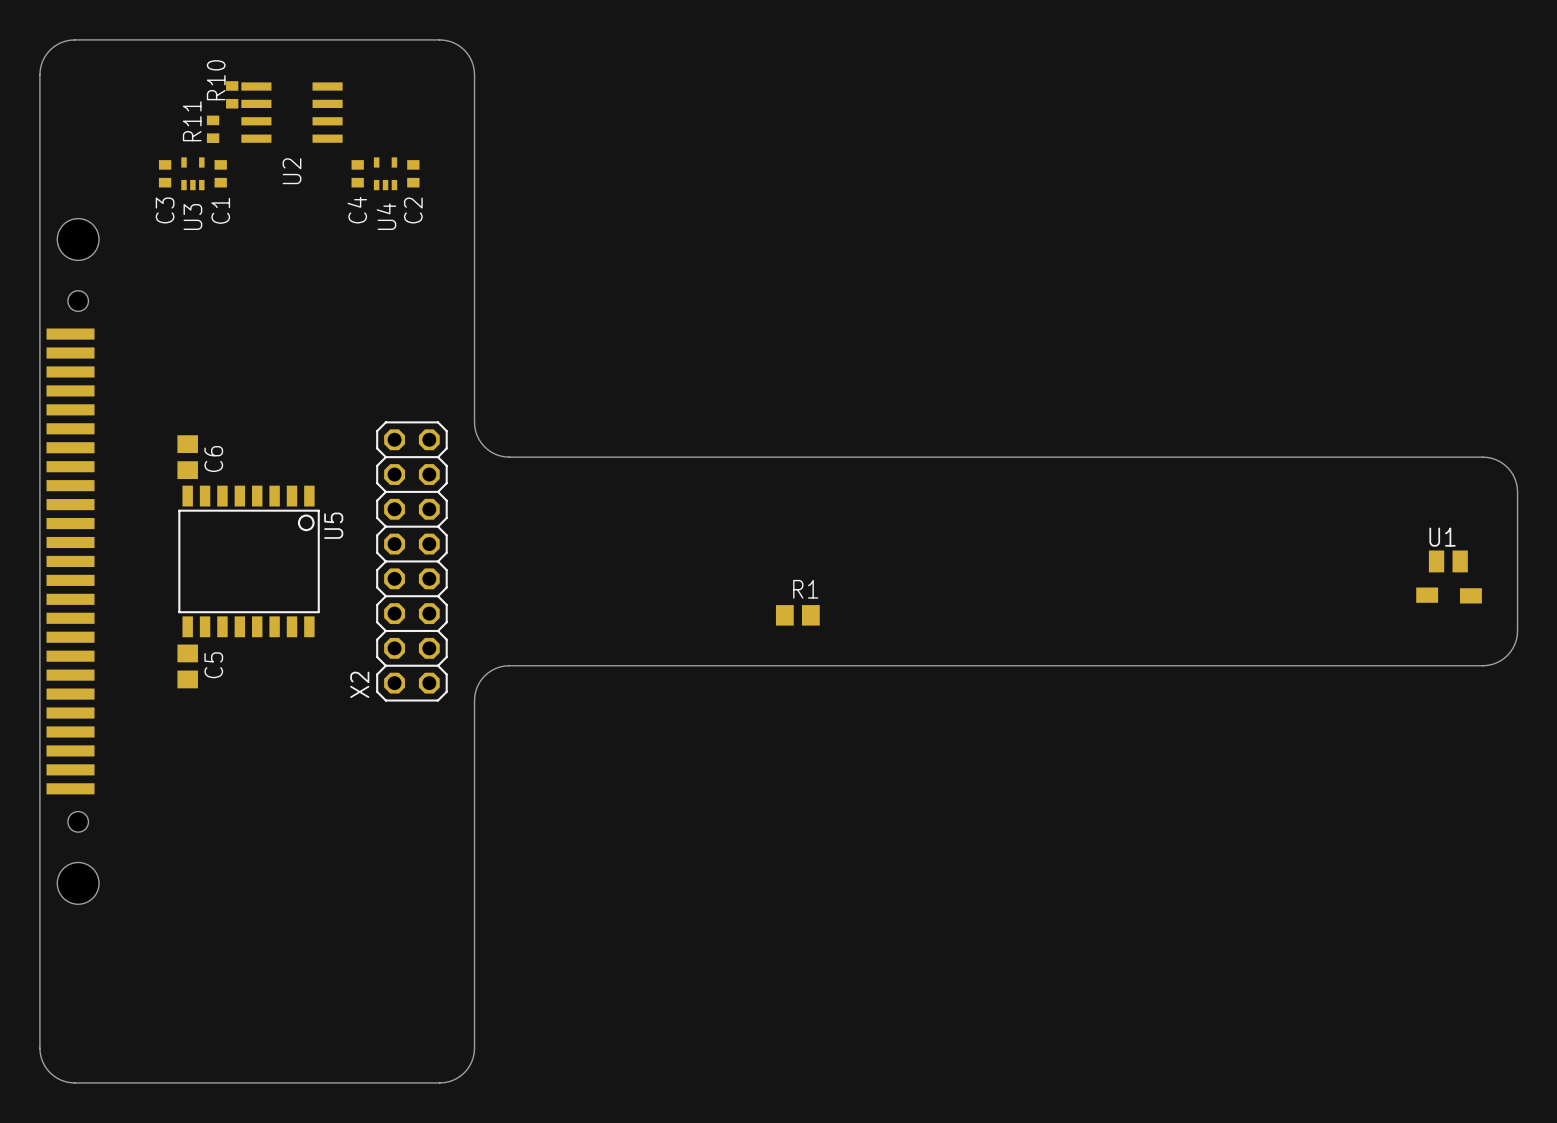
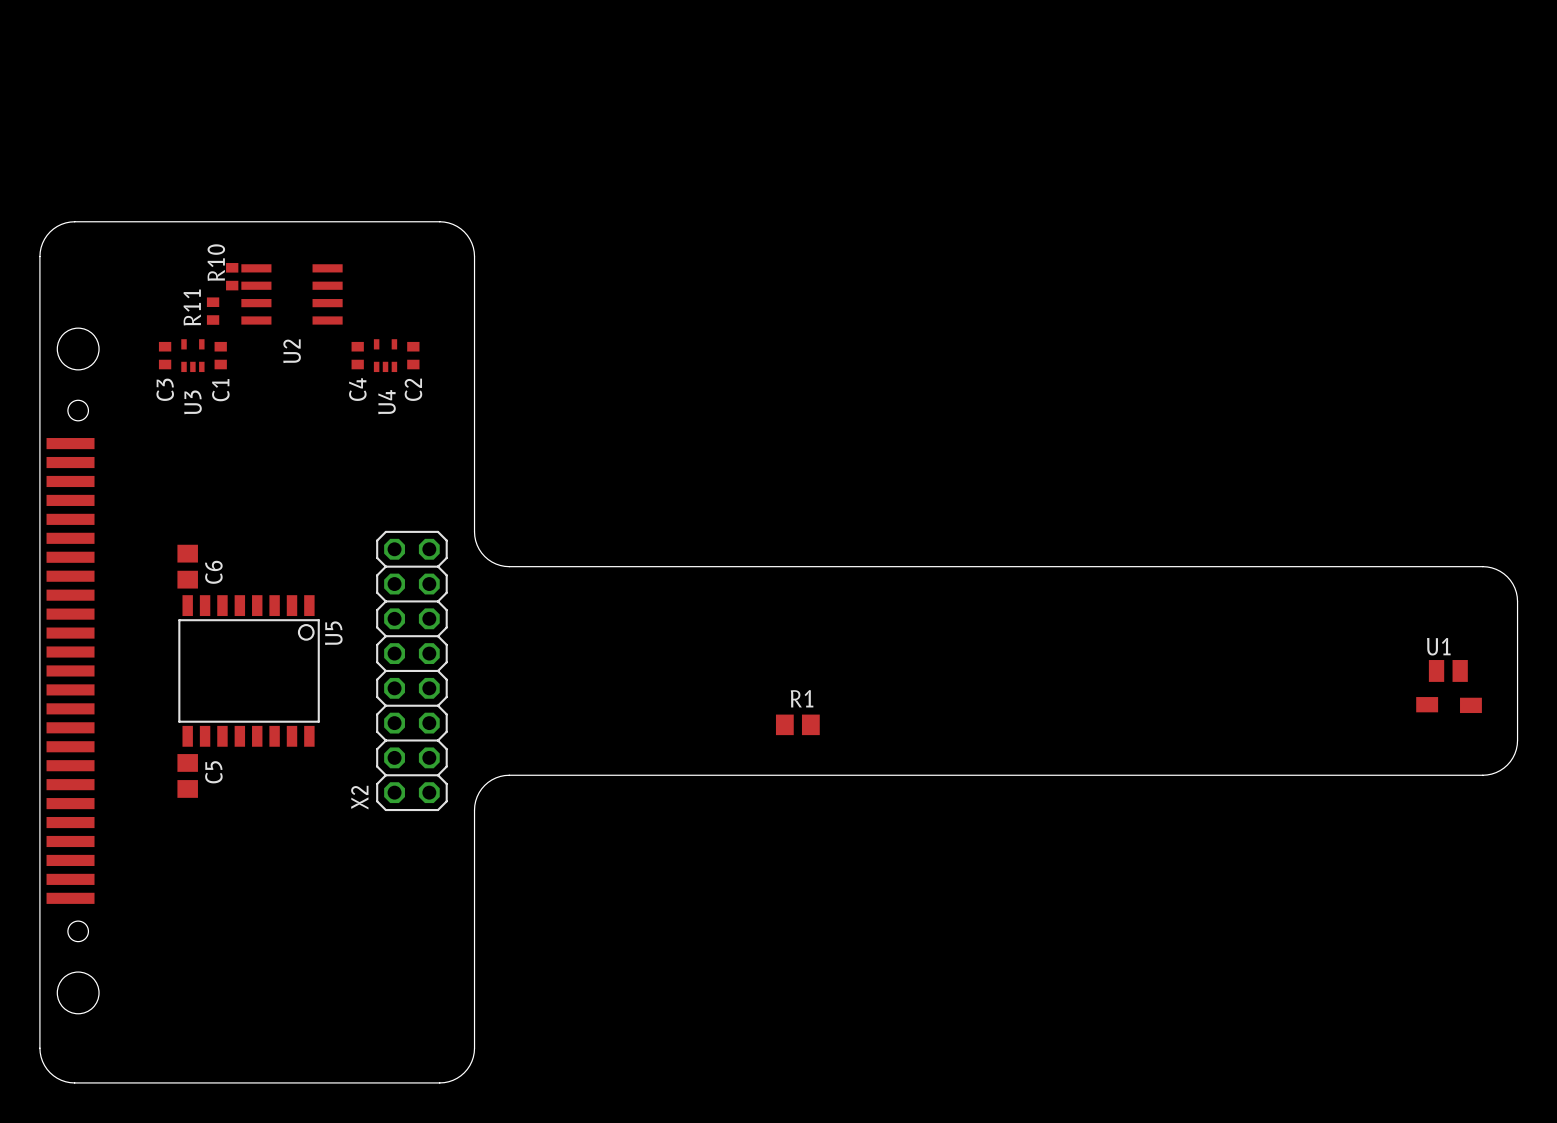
R10 position: (232, 94) -> (232, 276)
U2 position: (291, 112) -> (291, 294)
R11 position: (213, 129) -> (213, 311)
C3 position: (165, 173) -> (165, 355)
U3 position: (192, 173) -> (192, 355)
C1 position: (220, 173) -> (220, 355)
C4 position: (357, 173) -> (357, 355)
U4 position: (385, 173) -> (385, 355)
C2 position: (413, 173) -> (413, 355)
board edge: (39, 256) (40, 70) (42, 61) (50, 50) (61, 42) (74, 39) (439, 39) (457, 44) (467, 53) (474, 70) (474, 256) -> (39, 256) (42, 243) (50, 231) (61, 224) (74, 221) (444, 222) (453, 224) (464, 231) (471, 243) (474, 256)
board edge: (474, 422) (477, 435) (484, 446) (495, 454) (509, 457) (1487, 457) (1496, 459) (1507, 467) (1516, 482) (1517, 601) -> (474, 422) (475, 540) (484, 556) (495, 564) (504, 566) (1482, 566) (1496, 569) (1507, 576) (1514, 588) (1517, 601)
C6 position: (187, 457) -> (187, 566)
part position: (72, 561) -> (72, 670)
U5 position: (249, 561) -> (249, 670)
X2 position: (411, 561) -> (411, 670)
U1 position: (1449, 577) -> (1449, 686)
R1 position: (797, 615) -> (797, 724)
board edge: (1517, 630) (1514, 644) (1507, 655) (1496, 663) (1482, 665) (504, 666) (495, 668) (484, 675) (475, 691) (474, 810) -> (1517, 630) (1516, 749) (1507, 765) (1496, 772) (1487, 774) (509, 775) (495, 777) (484, 785) (477, 796) (474, 810)
C5 position: (187, 666) -> (187, 775)

